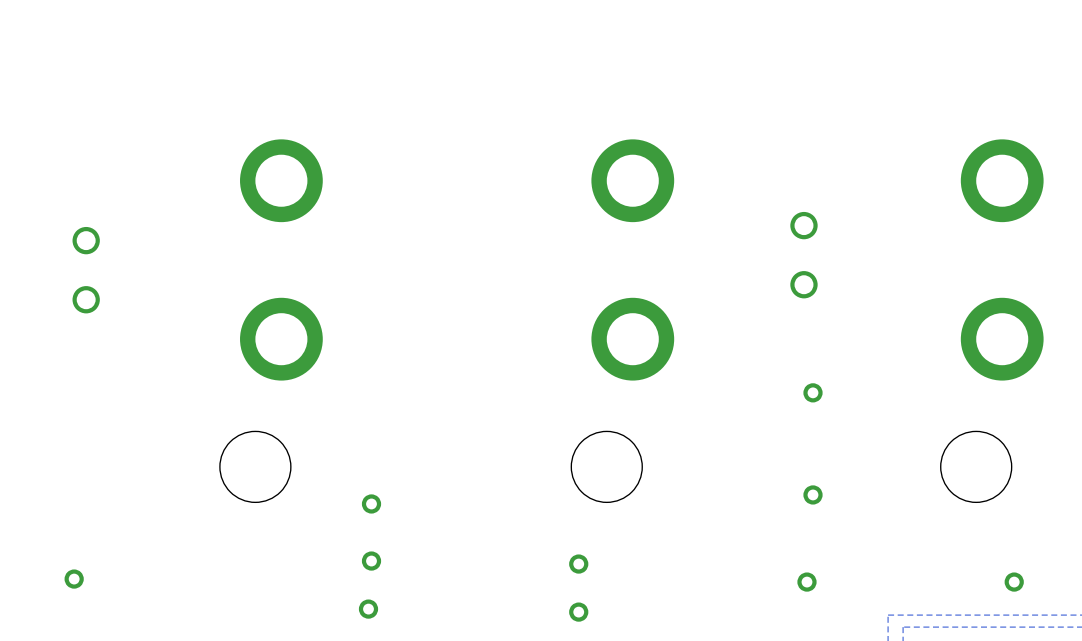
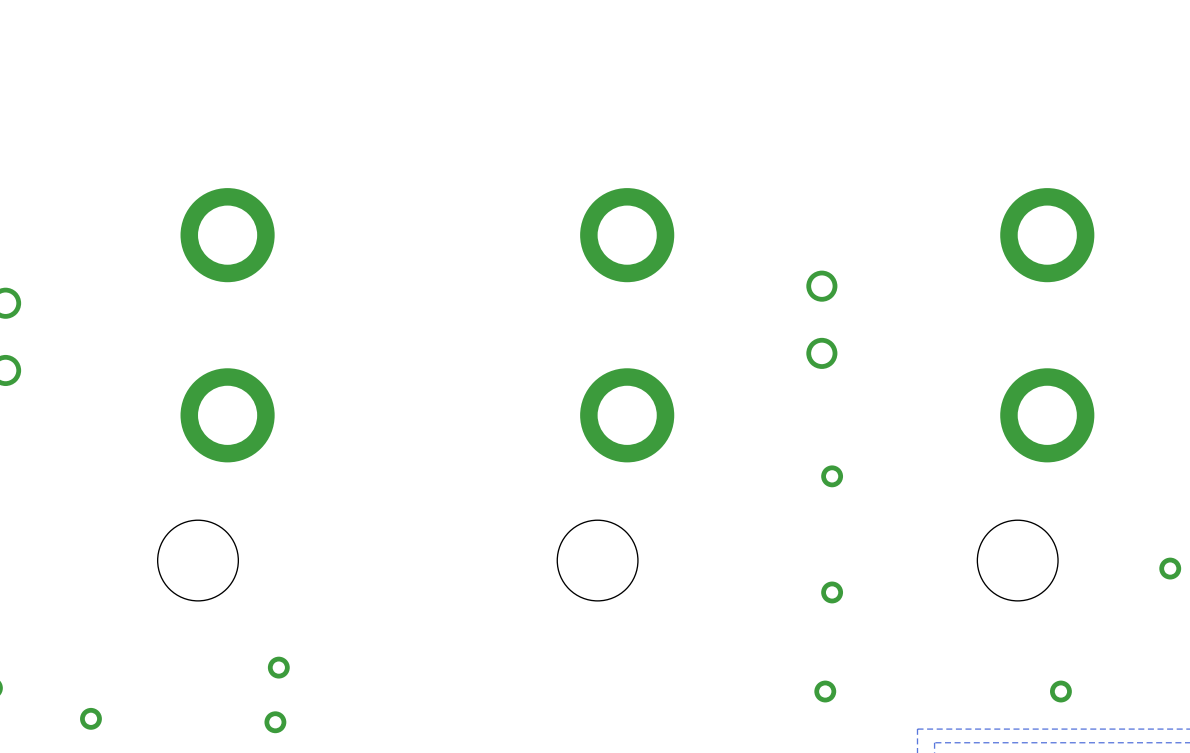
via: (371, 503) -> none
via: none -> (278, 667)
via: (371, 561) -> none
via: (578, 564) -> none
via: none -> (90, 718)
via: none -> (275, 722)
via: (368, 609) -> none
via: (578, 612) -> none

